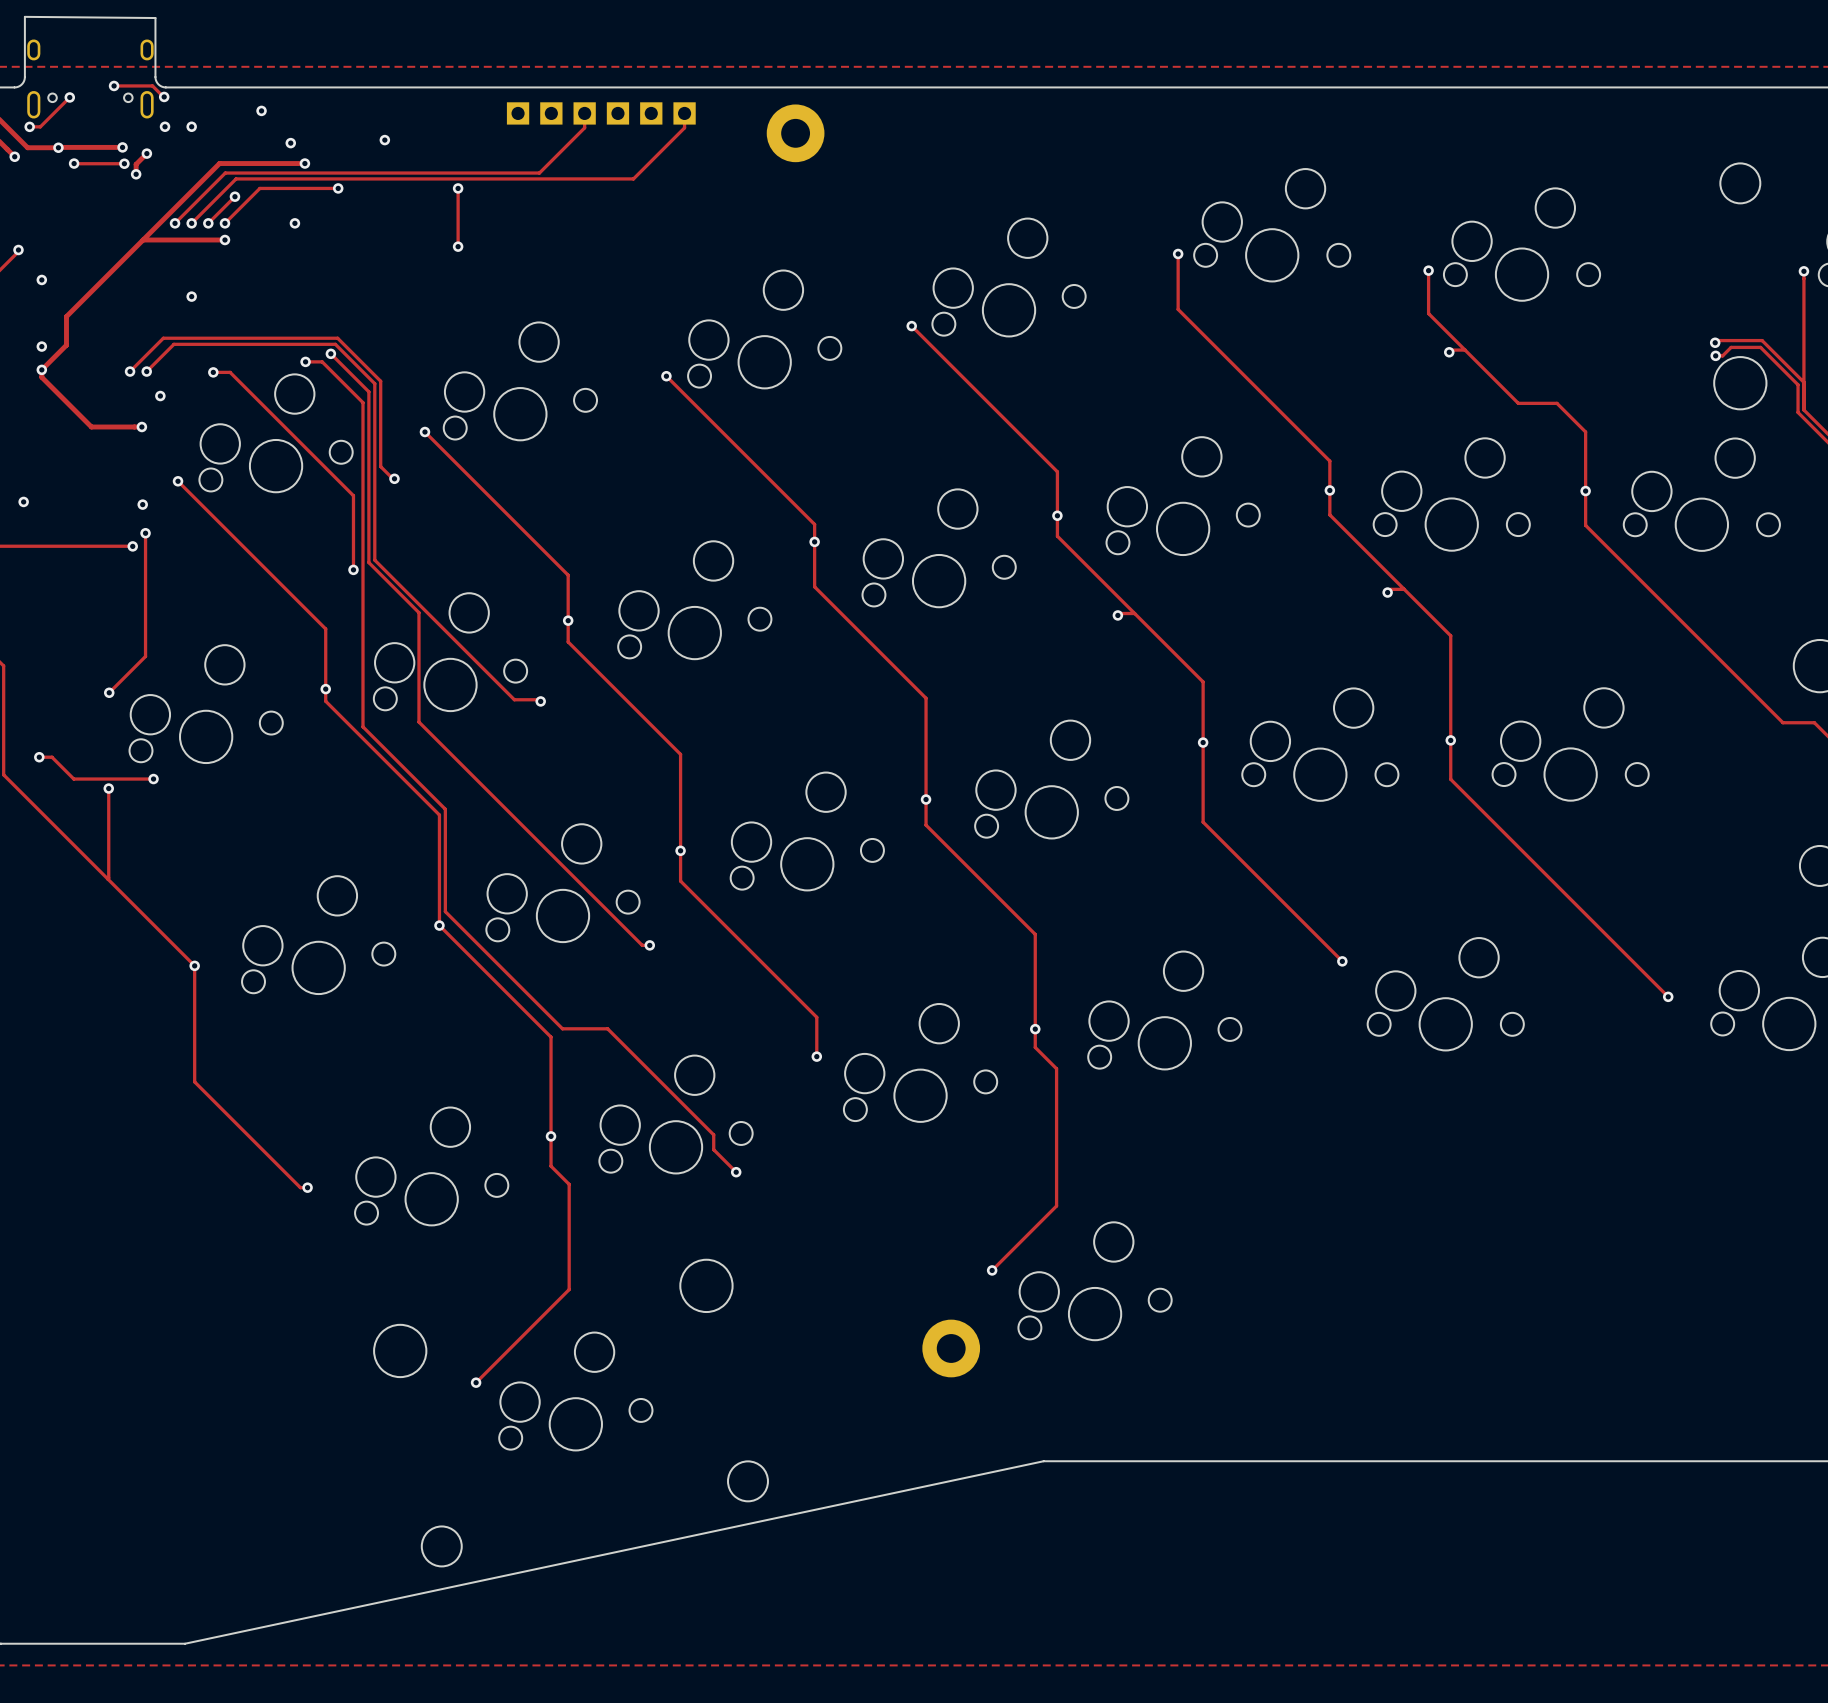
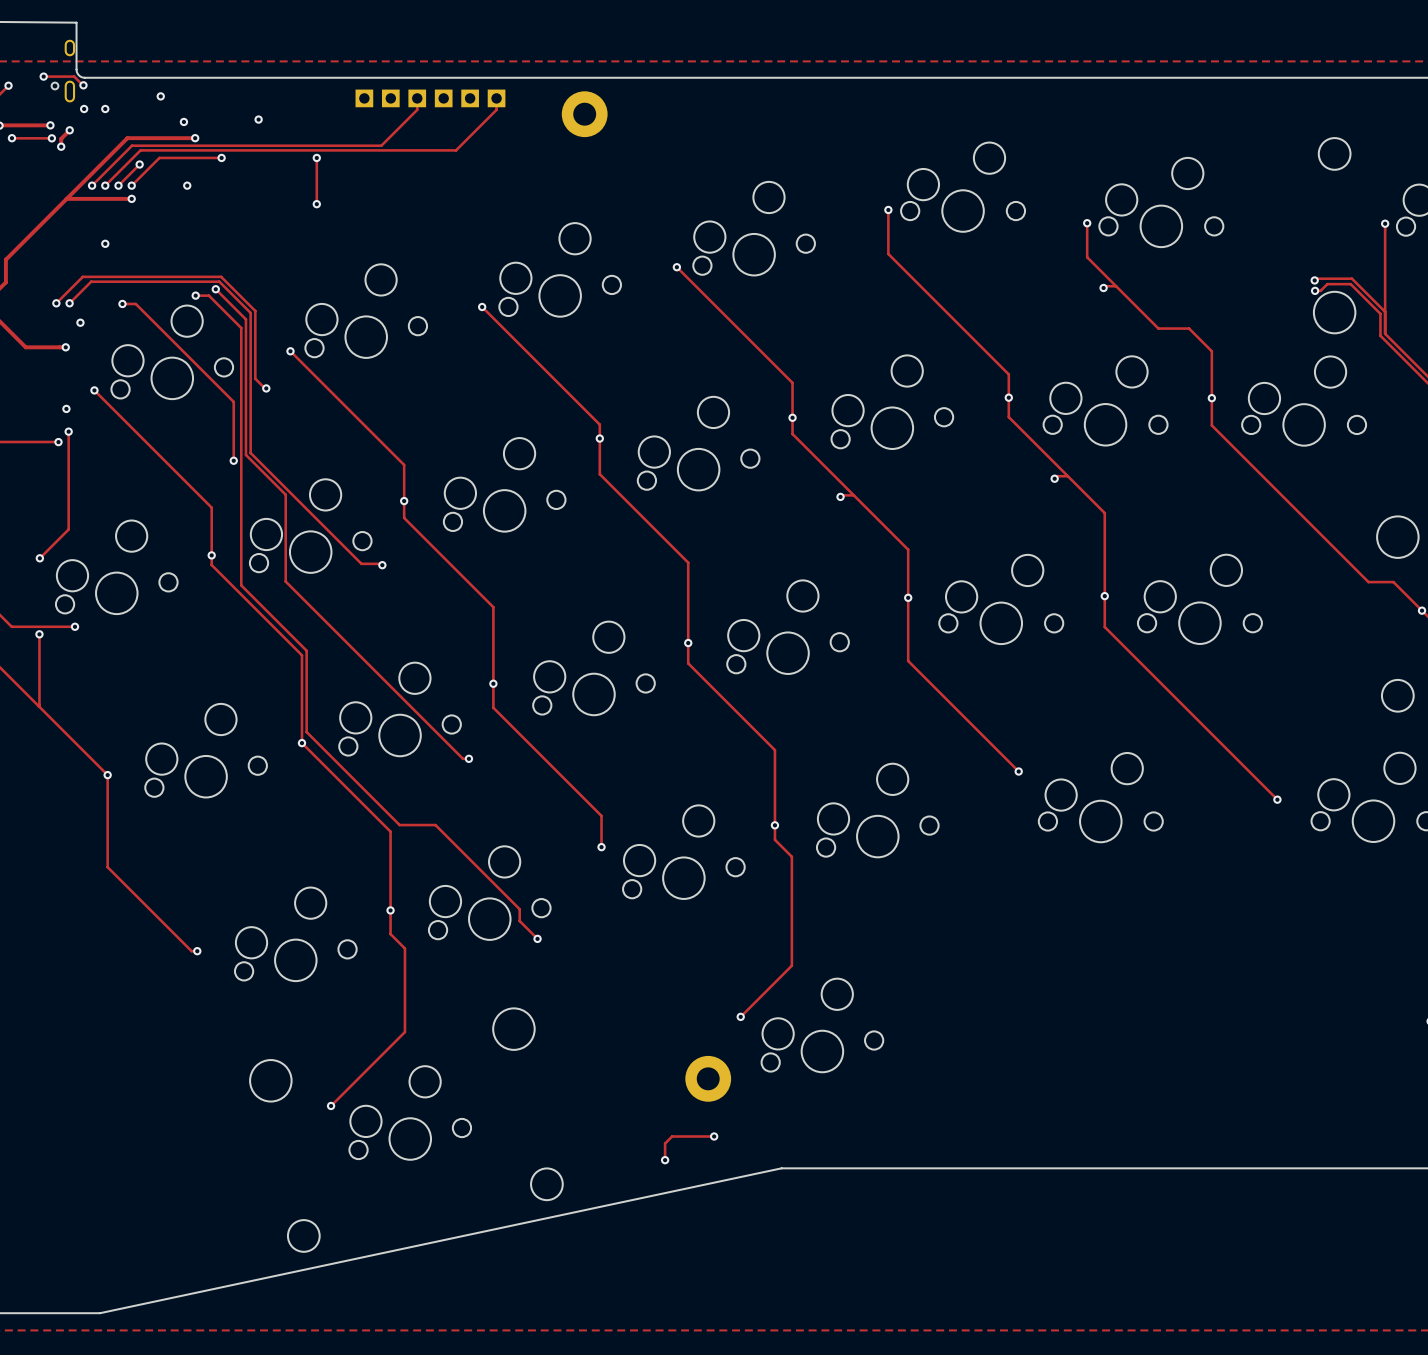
track: none -> (714, 1136) (672, 1136) (665, 1143) (665, 1160)
via: none -> (714, 1136)
via: none -> (665, 1160)

